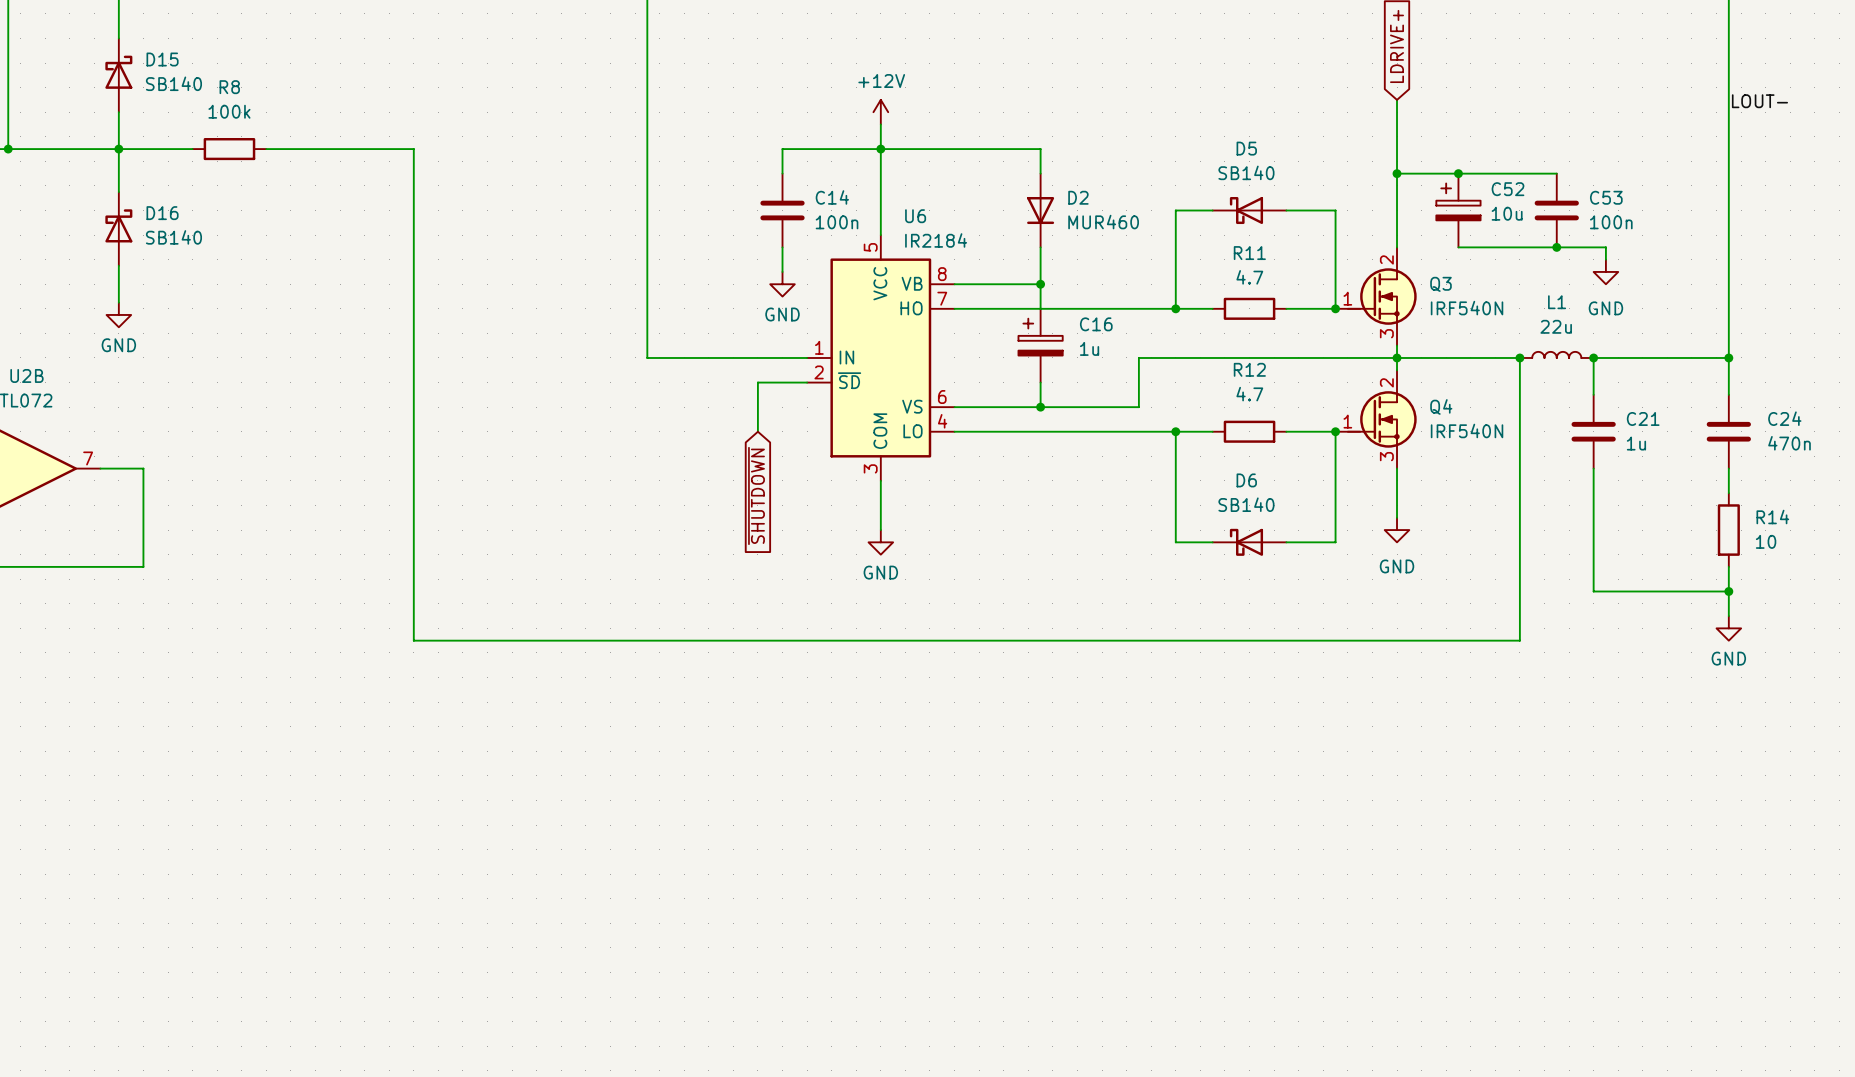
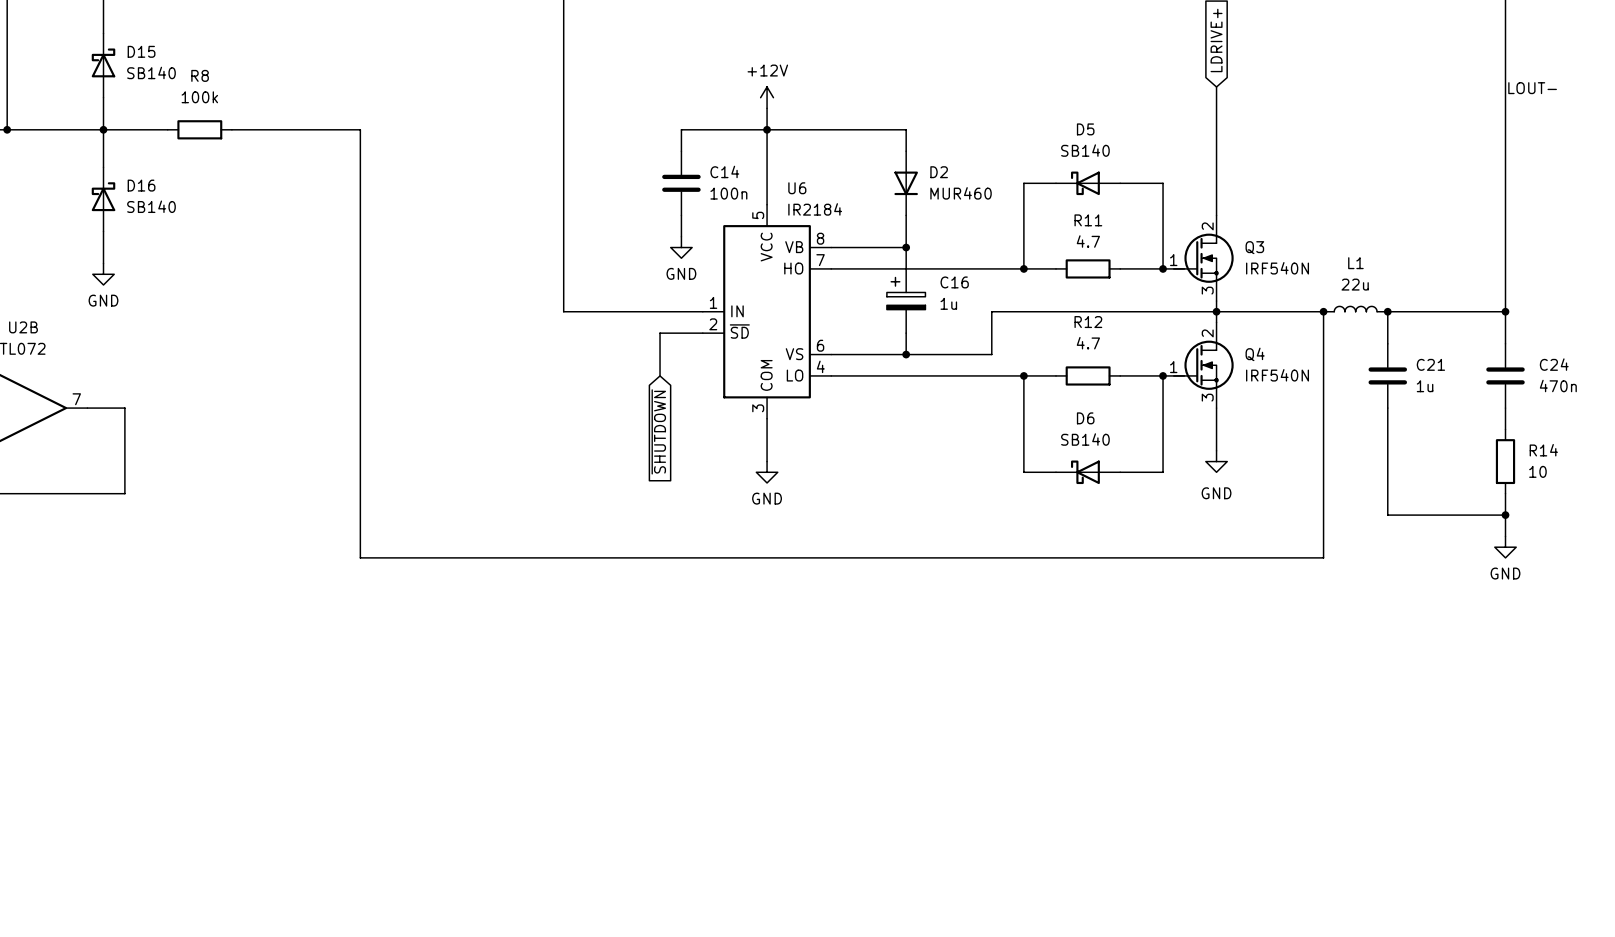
wire: (1397, 173) (1556, 173) -> none
junction: (1397, 173) -> none
junction: (1458, 173) -> none
C52: 10u (1458, 210) -> none
C53: 100n (1556, 210) -> none
wire: (1458, 247) (1605, 247) (1605, 259) -> none
junction: (1556, 247) -> none
power symbol: GND (1605, 271) -> none

